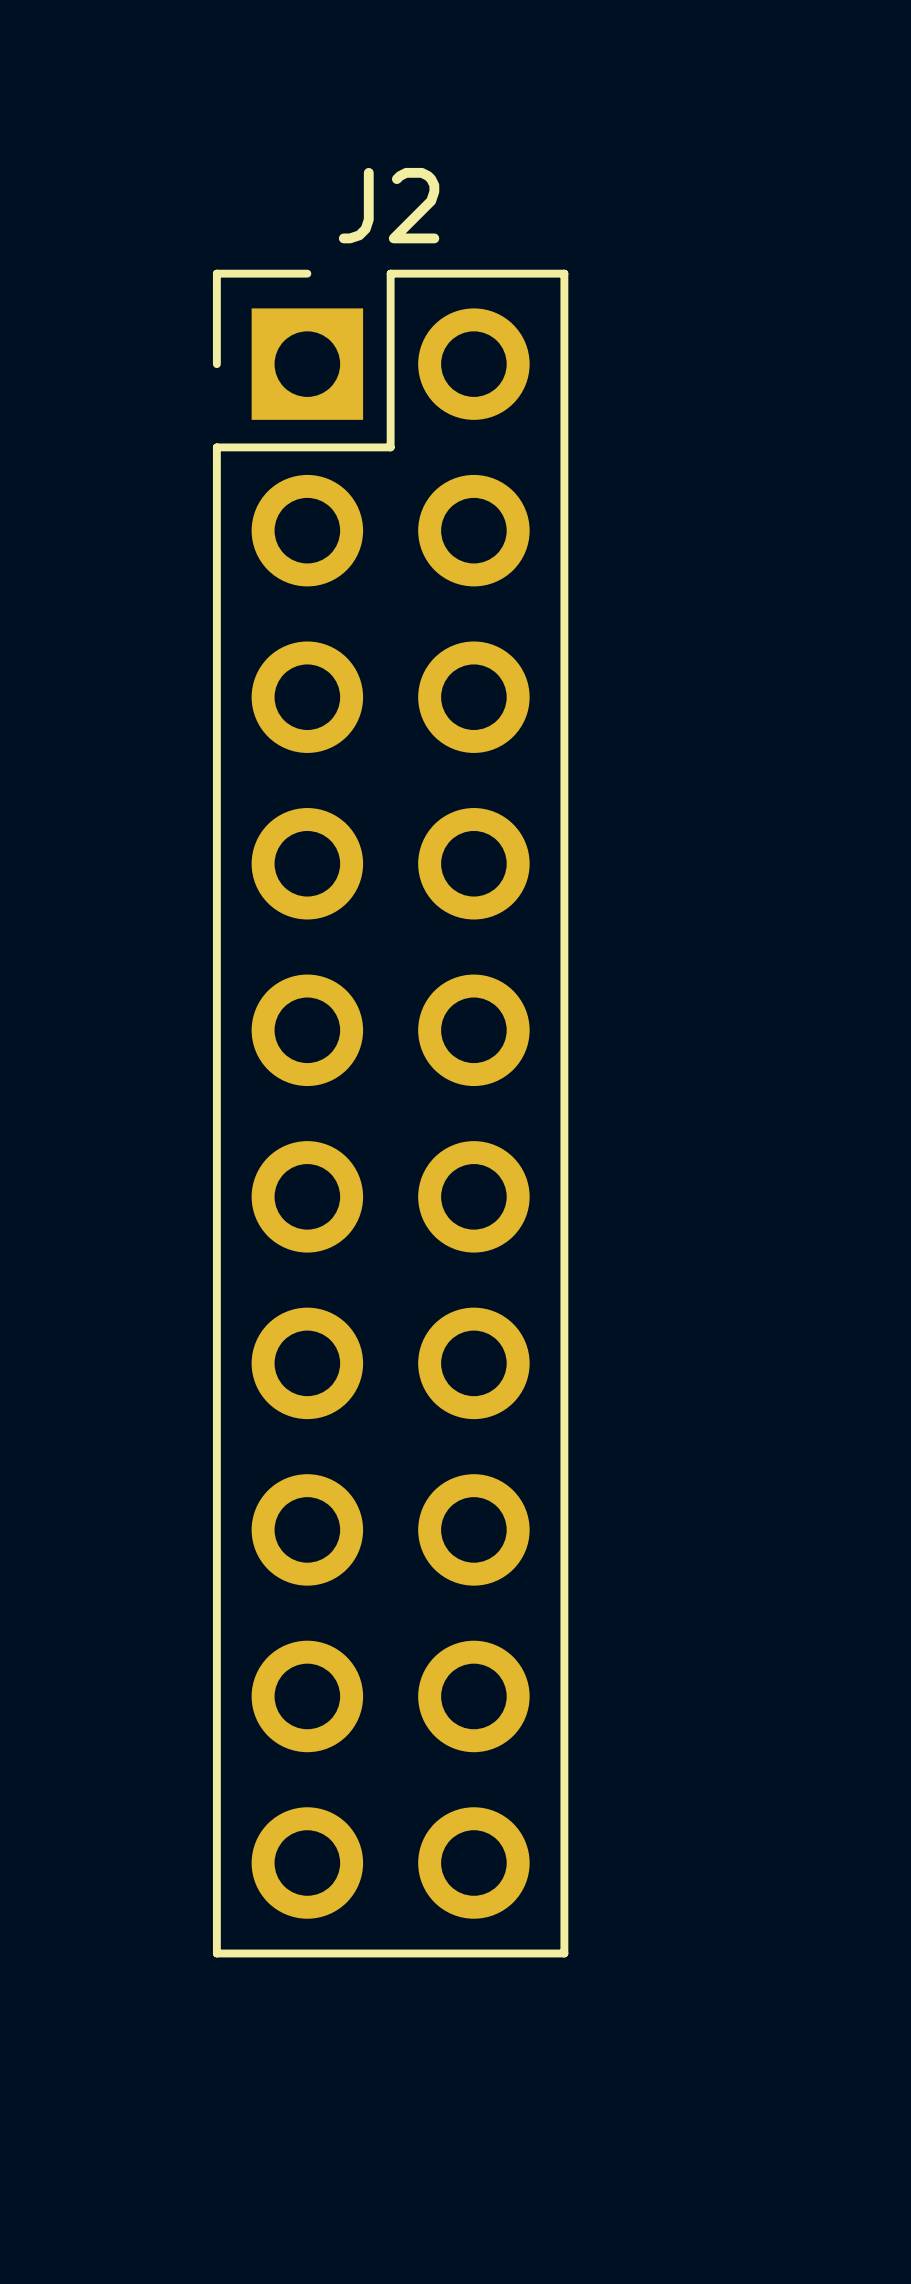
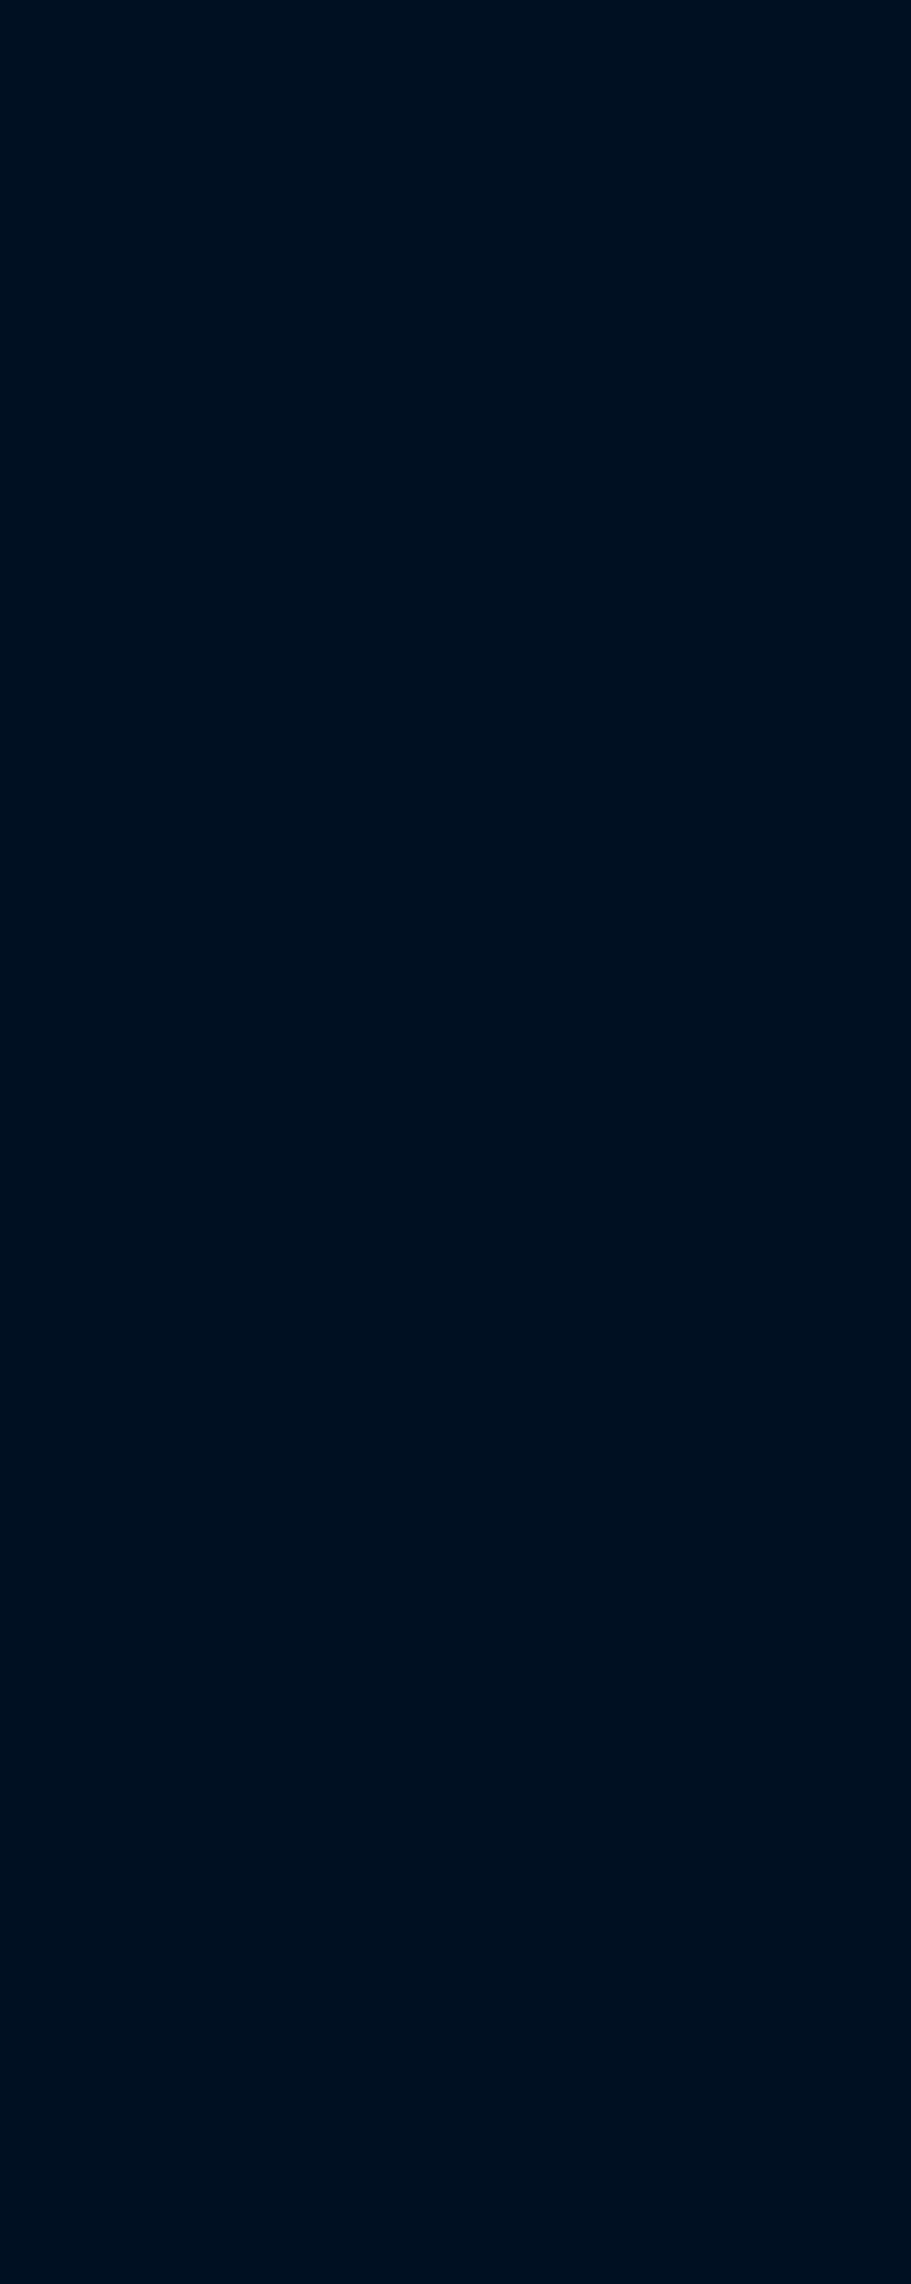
J2: (390, 1113) -> none

